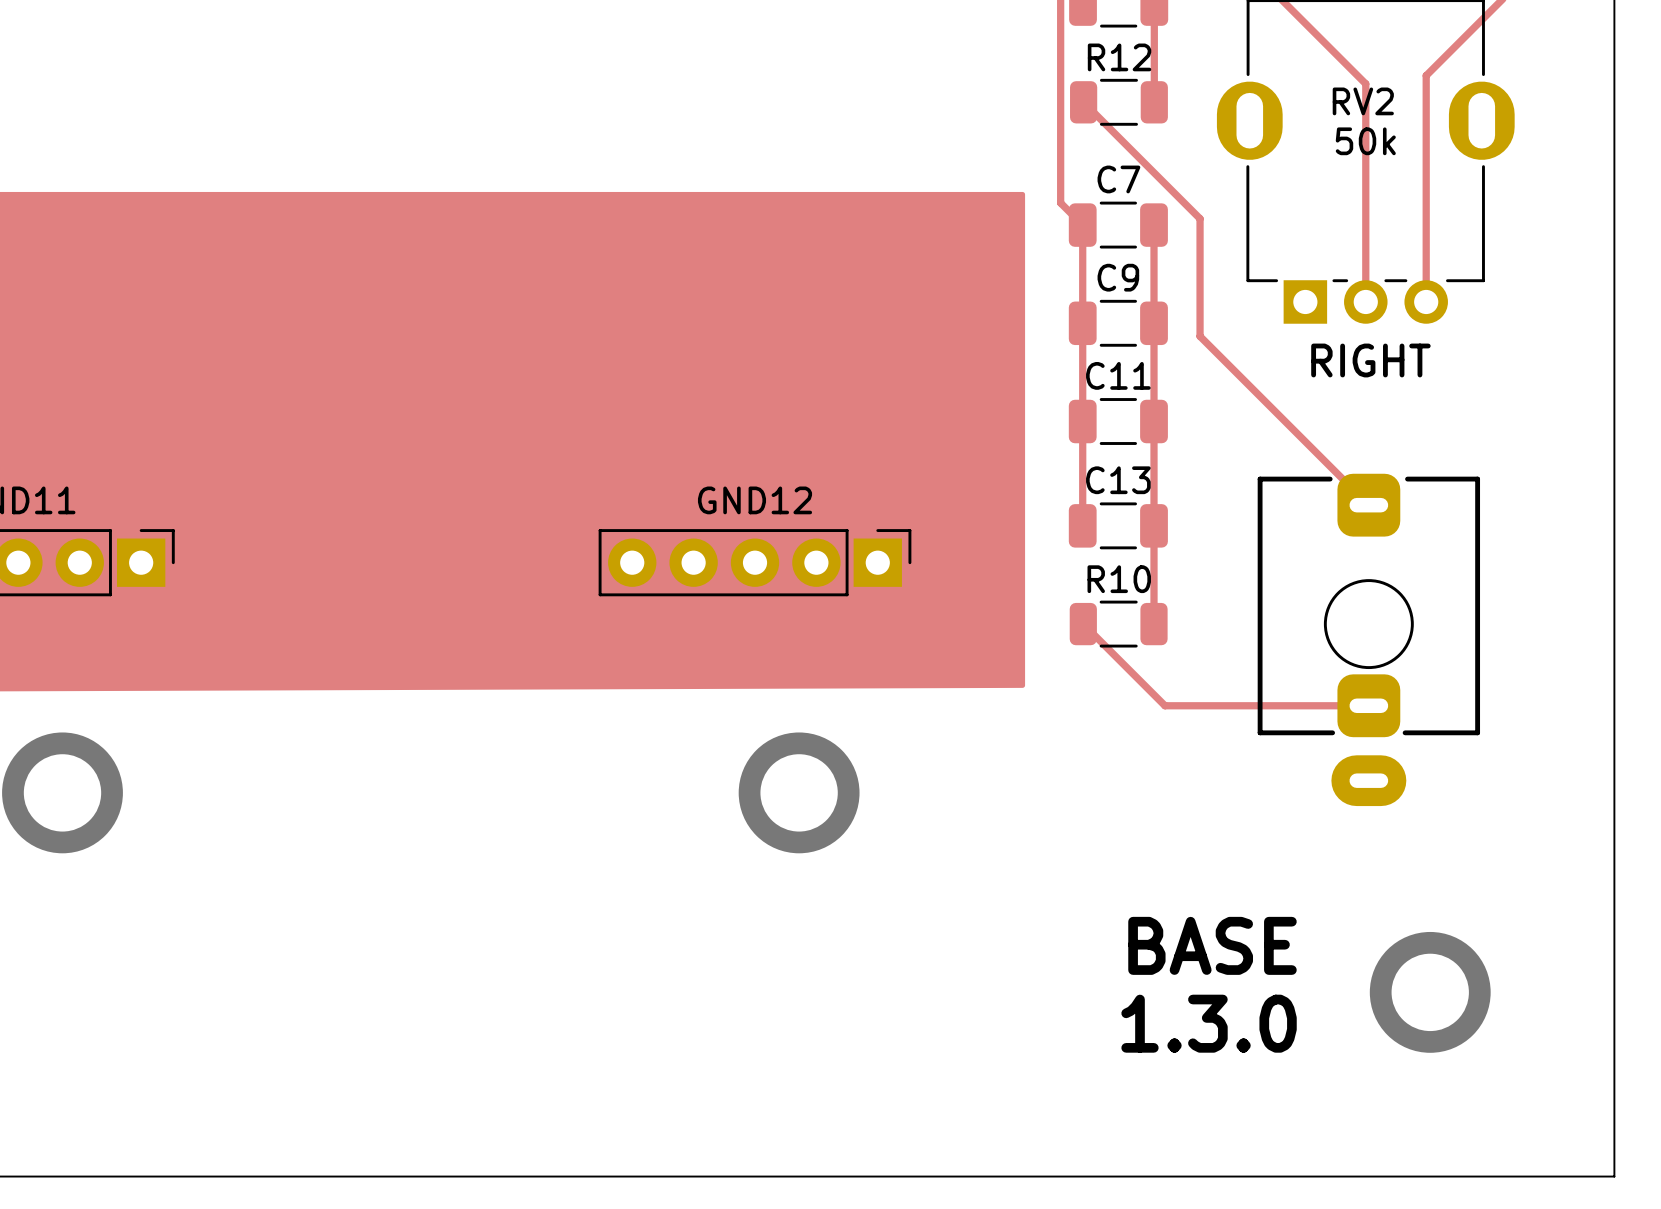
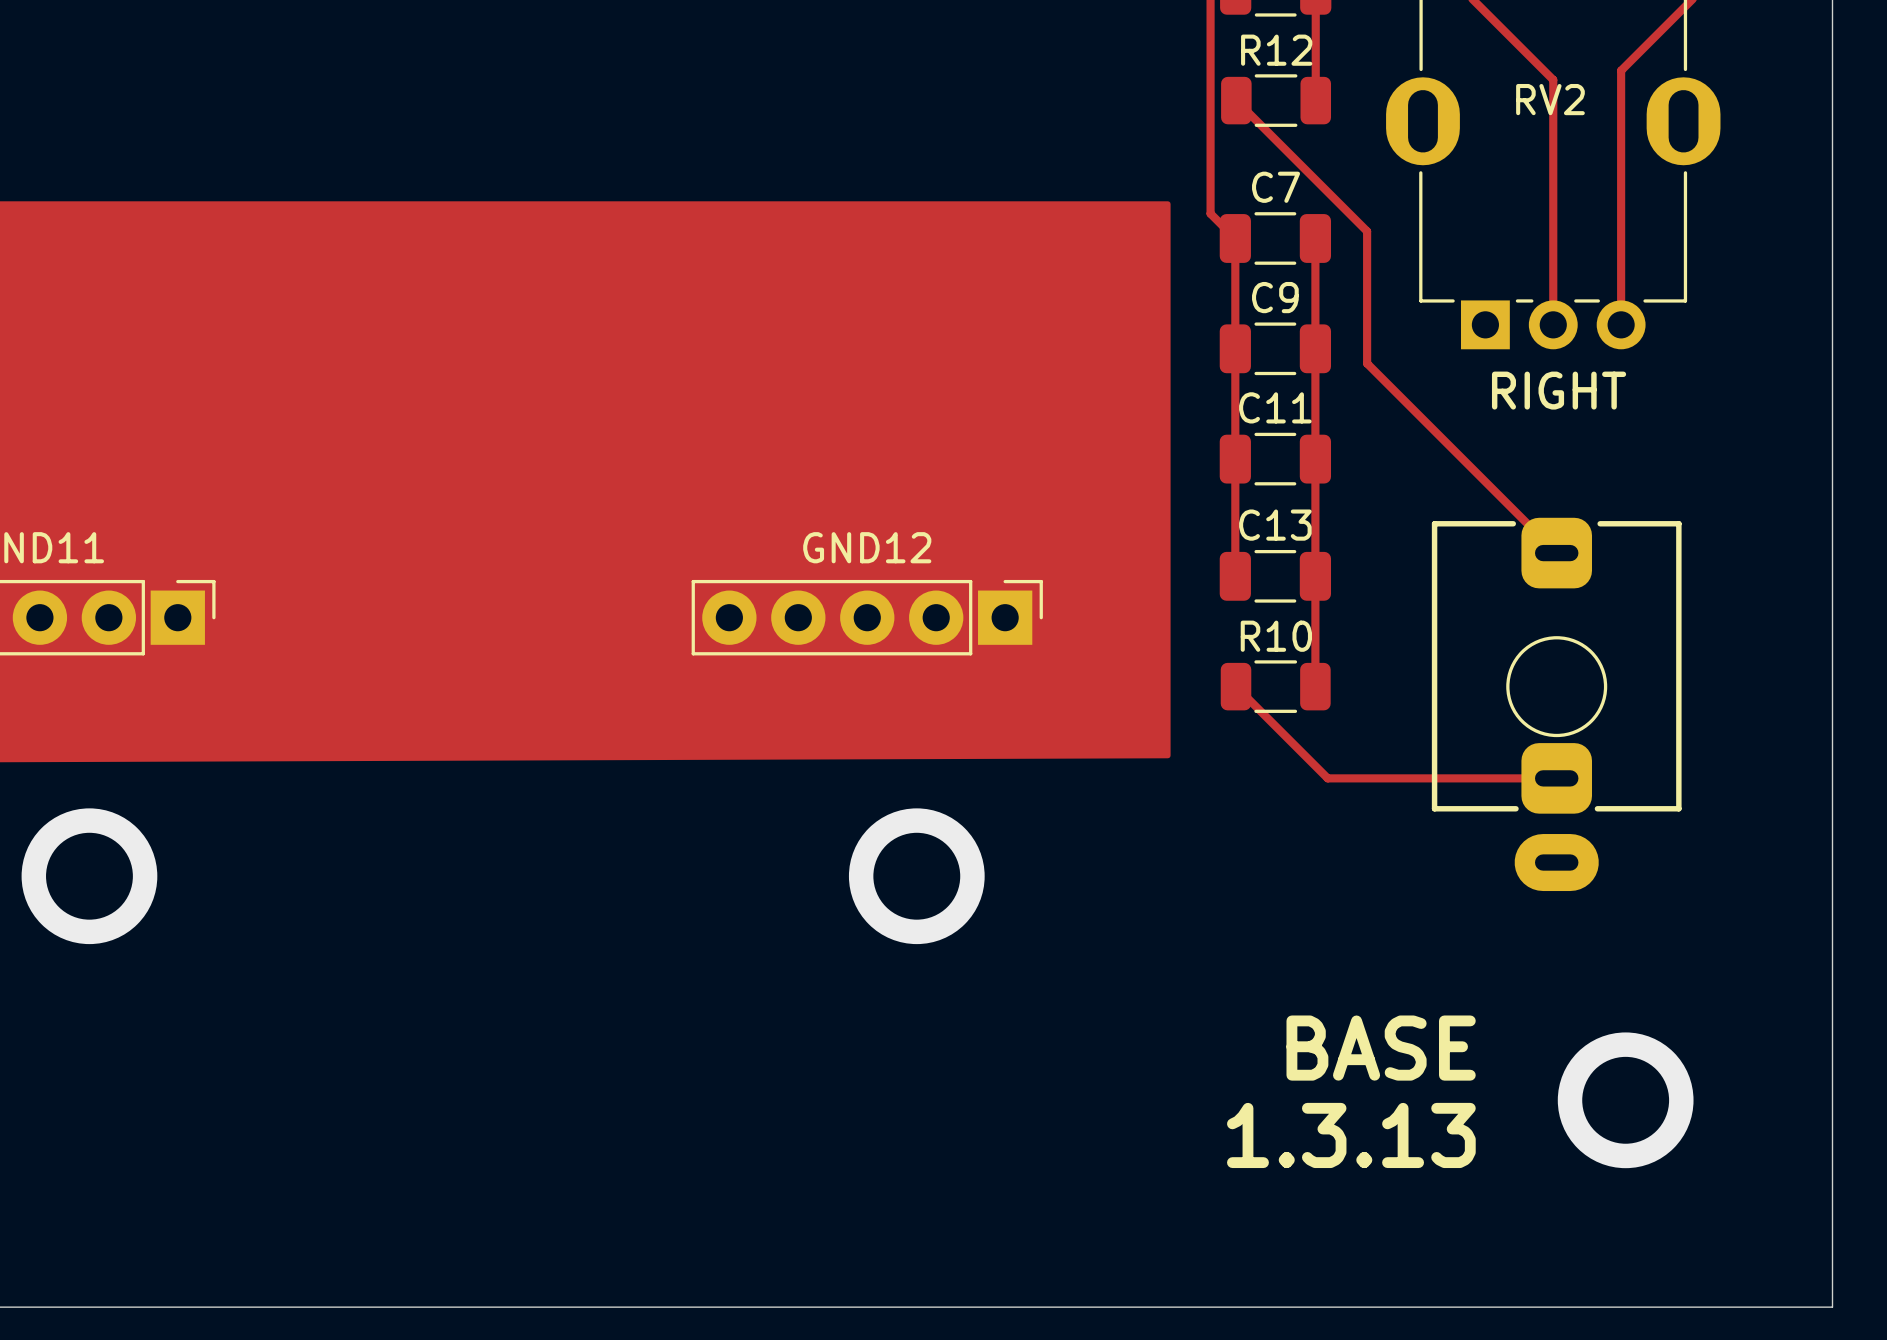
RV2 value: 50k (1365, 141) -> none
text: 1.3.0 (1209, 1023) -> 1.3.13 (1351, 1135)

